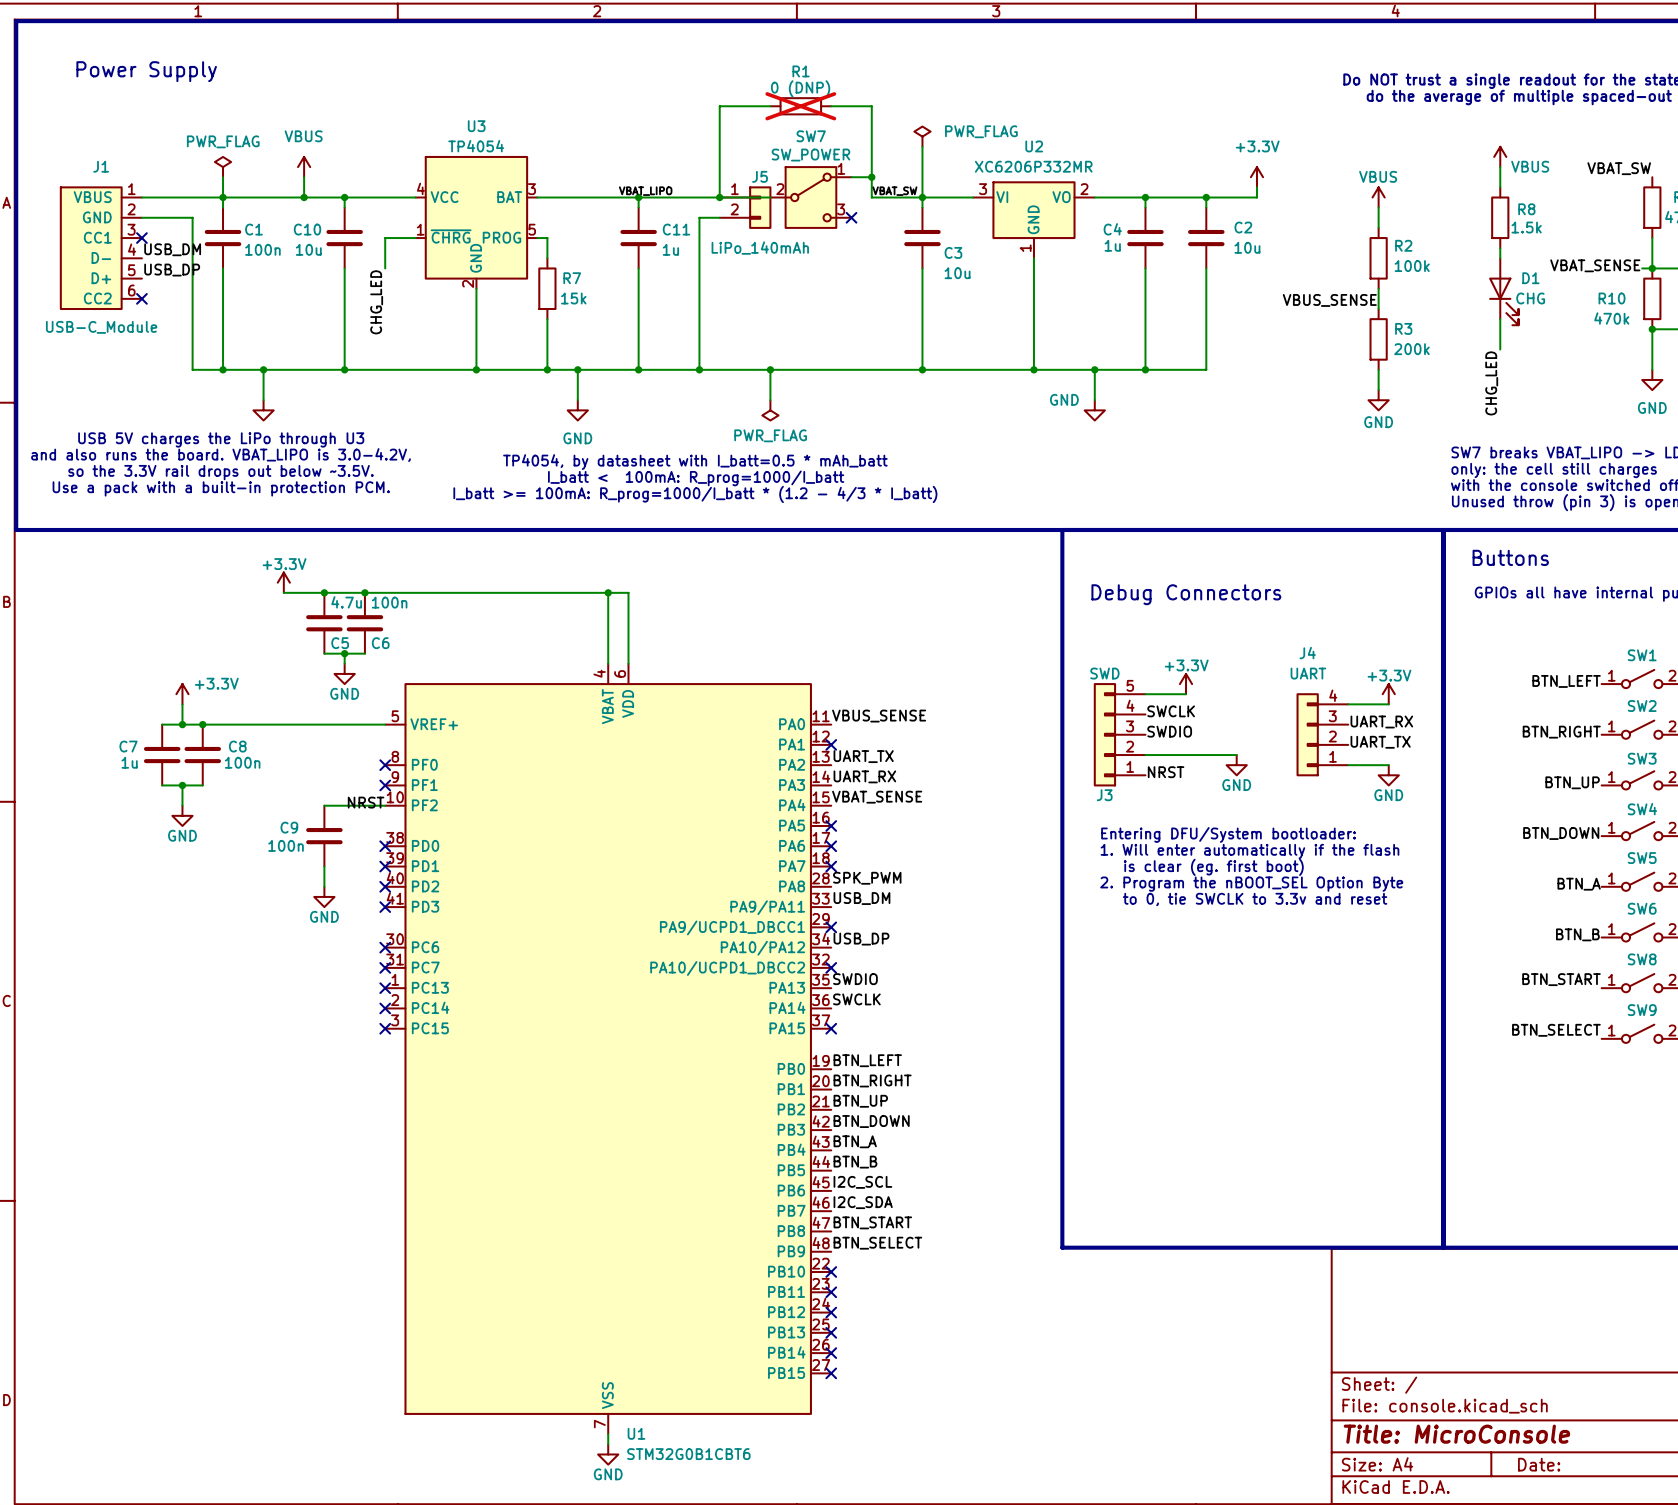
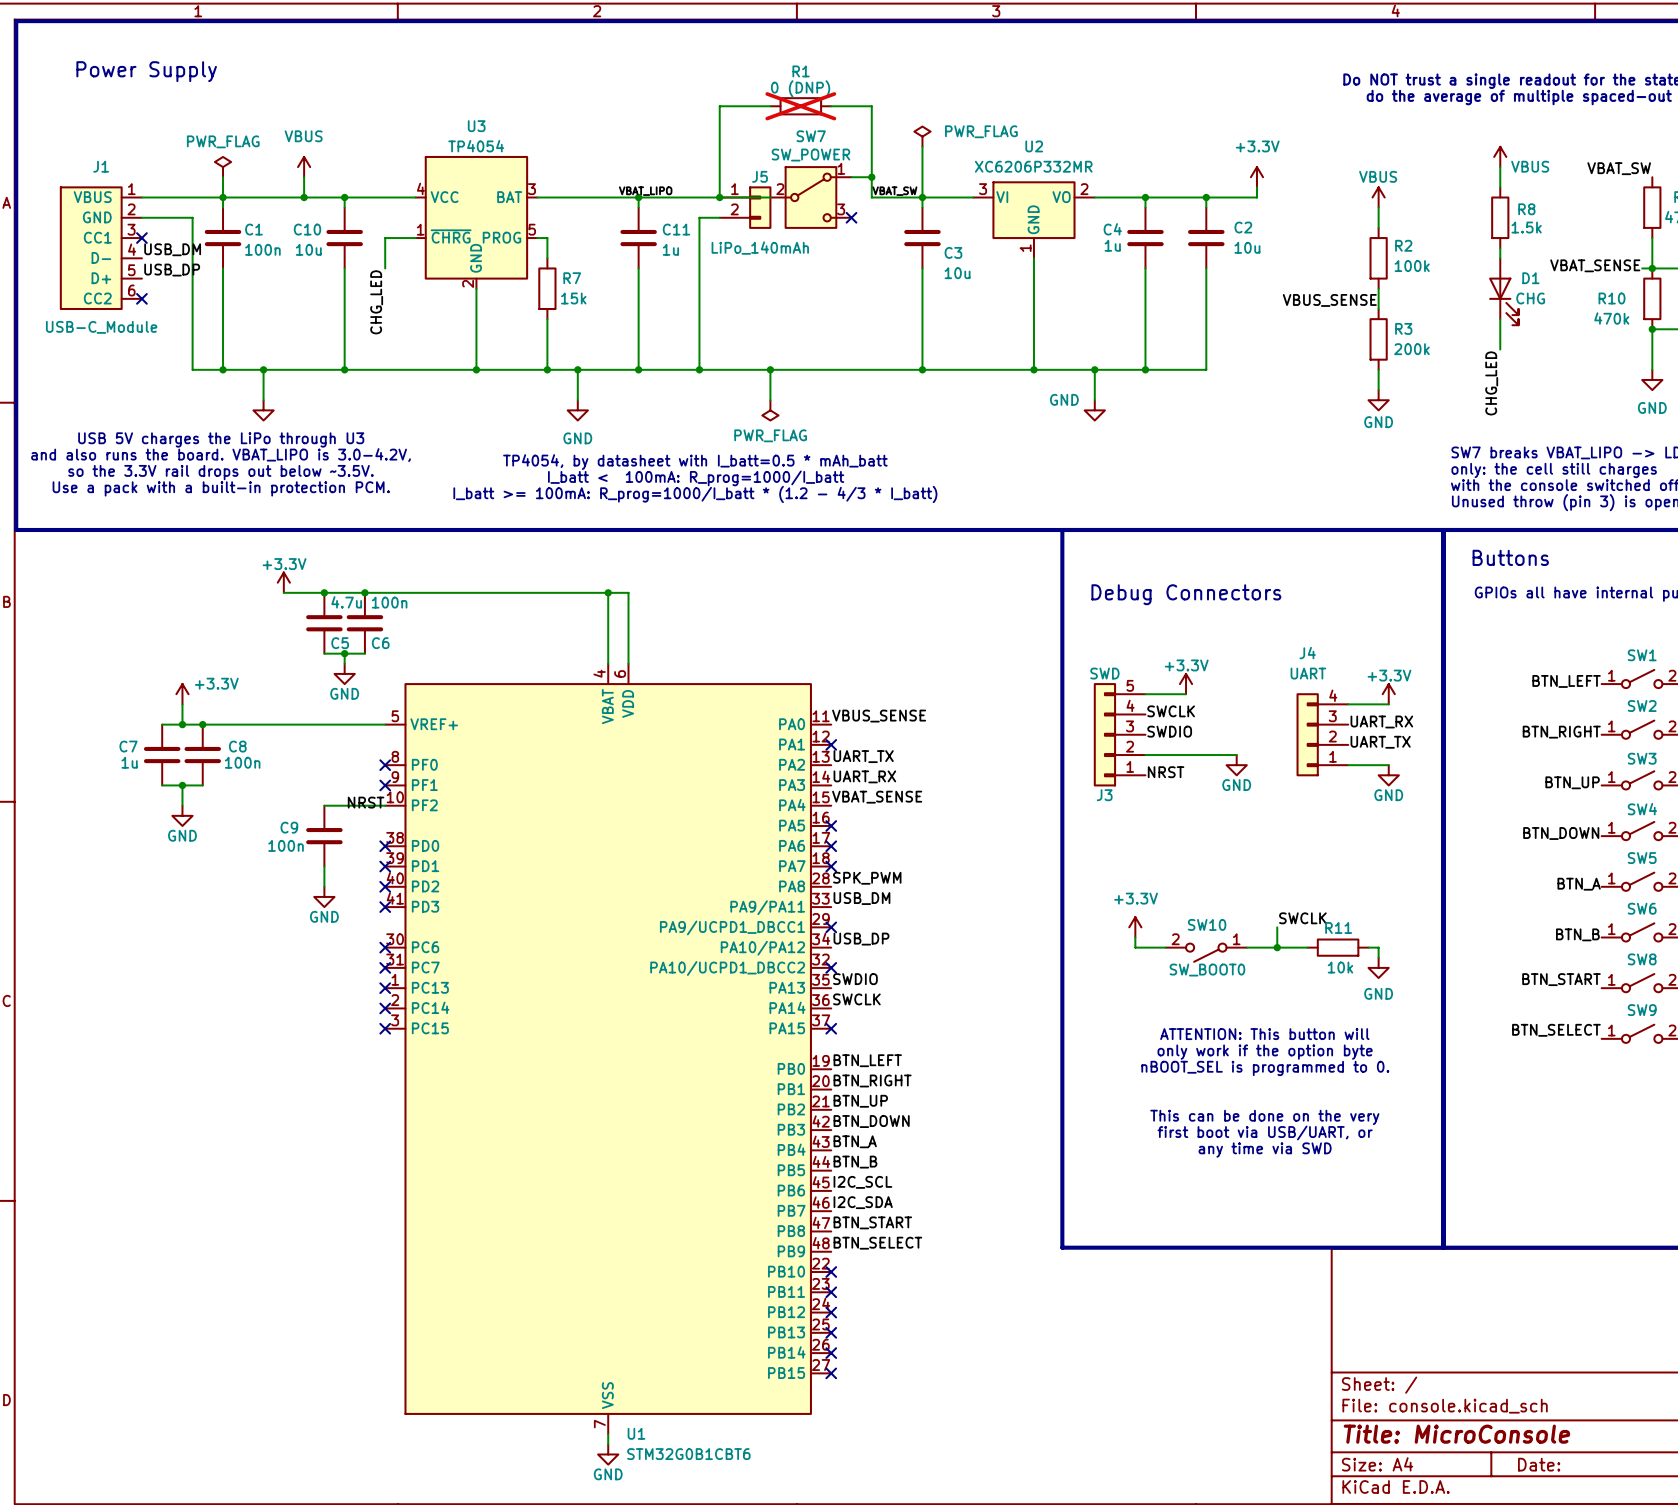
text: Entering DFU/System bootloader: (1228, 834) -> none
text: 1. Will enter automatically if the flash (1250, 851) -> none
text: is clear (eg. first boot) (1213, 867) -> none
text: 2. Program the nBOOT_SEL Option Byte (1251, 884) -> none
text: to 0, tie SWCLK to 3.3v and reset (1255, 899) -> none
label: none -> SWCLK (1302, 918)
power symbol: none -> +3.3V (1135, 927)
wire: none -> (1277, 927) (1277, 947)
wire: none -> (1135, 937) (1135, 947) (1165, 947)
wire: none -> (1246, 947) (1307, 947)
junction: none -> (1277, 947)
R11: none -> 10k (1338, 947)
wire: none -> (1368, 947) (1378, 947) (1378, 957)
SW10: none -> SW_BOOT0 (1206, 952)
power symbol: none -> GND (1378, 967)
text: none -> ATTENTION: This button will (1264, 1034)
text: none -> only work if the option byte (1265, 1052)
text: none -> nBOOT_SEL is programmed to 0. (1265, 1068)
text: none -> This can be done on the very (1264, 1117)
text: none -> first boot via USB/UART, or (1265, 1132)
text: none -> any time via SWD (1265, 1150)

